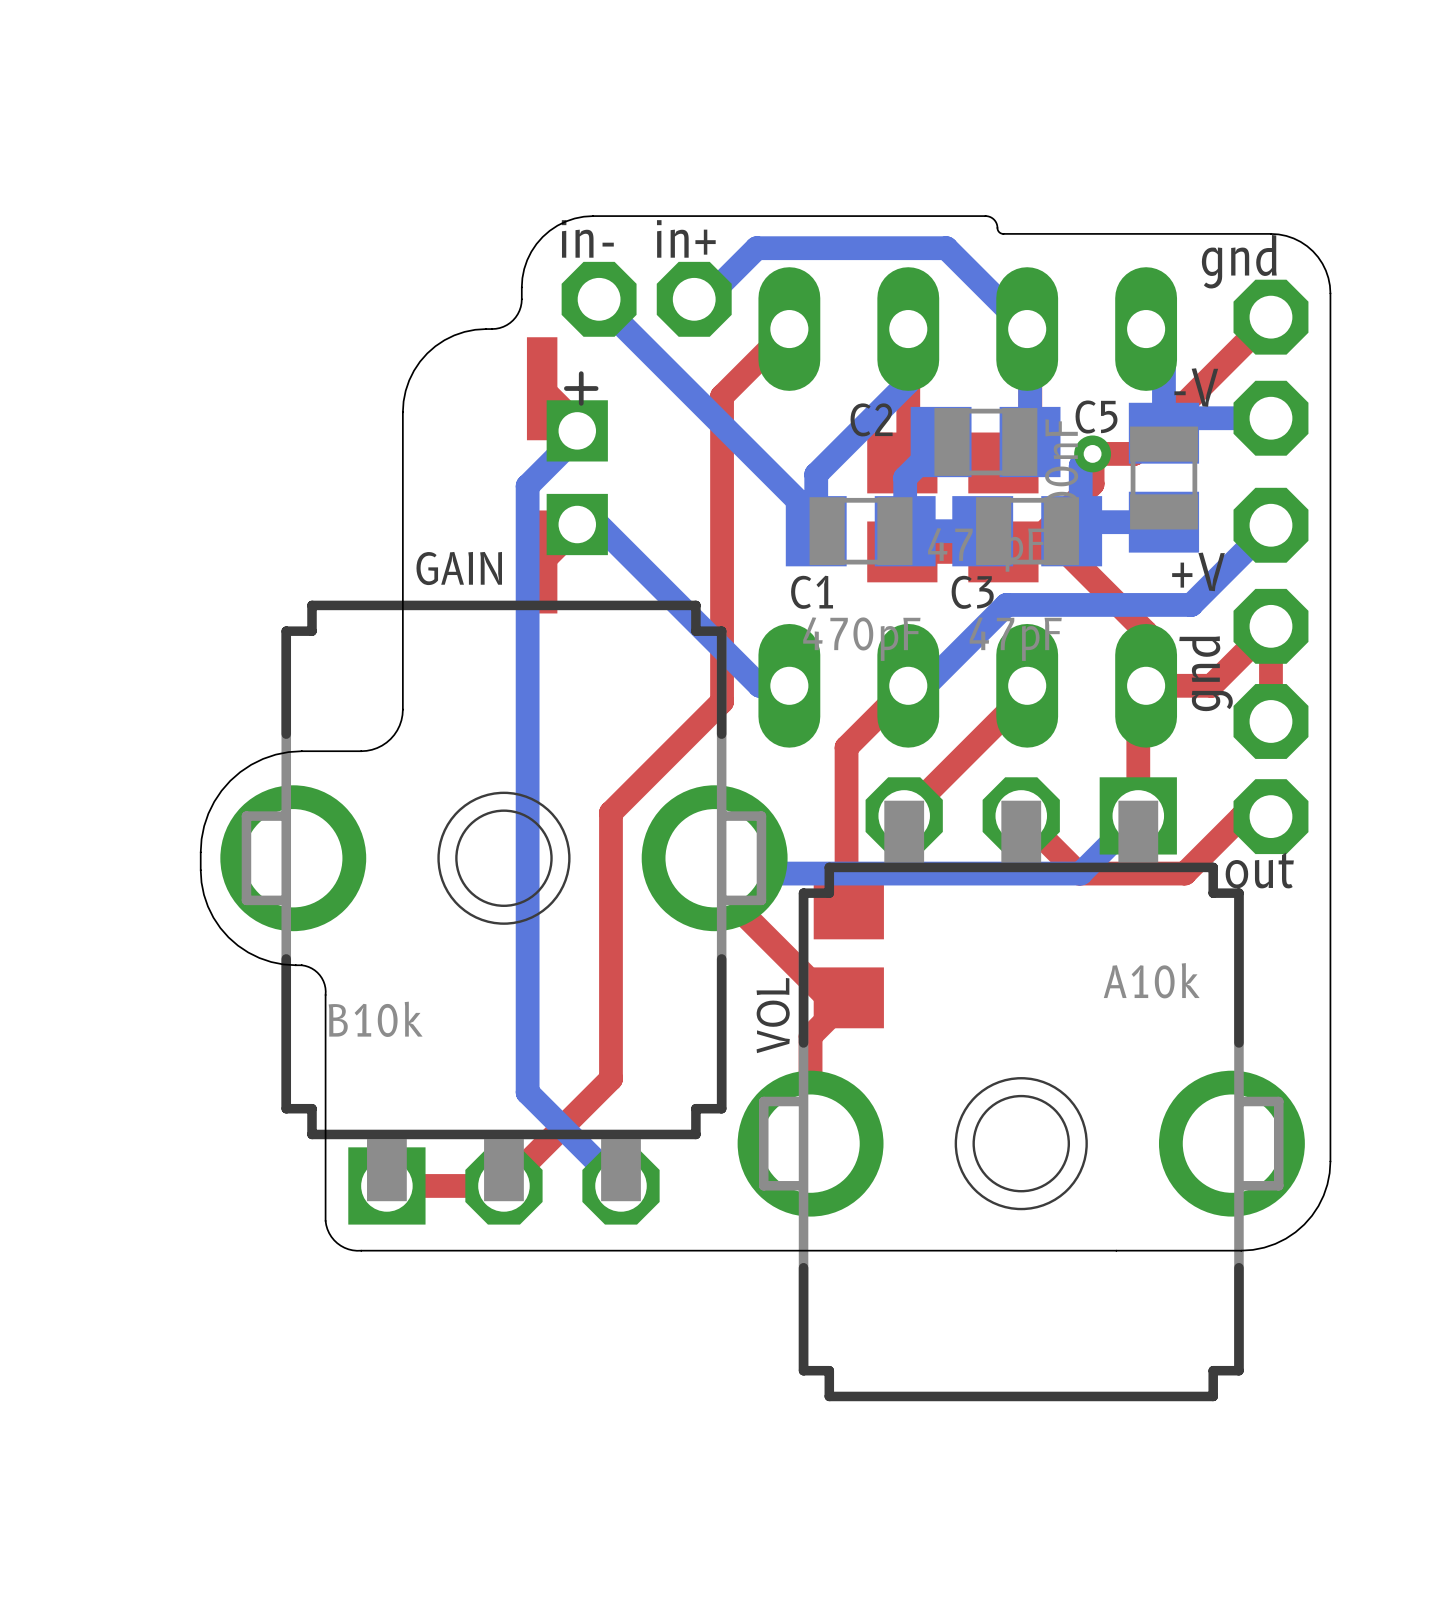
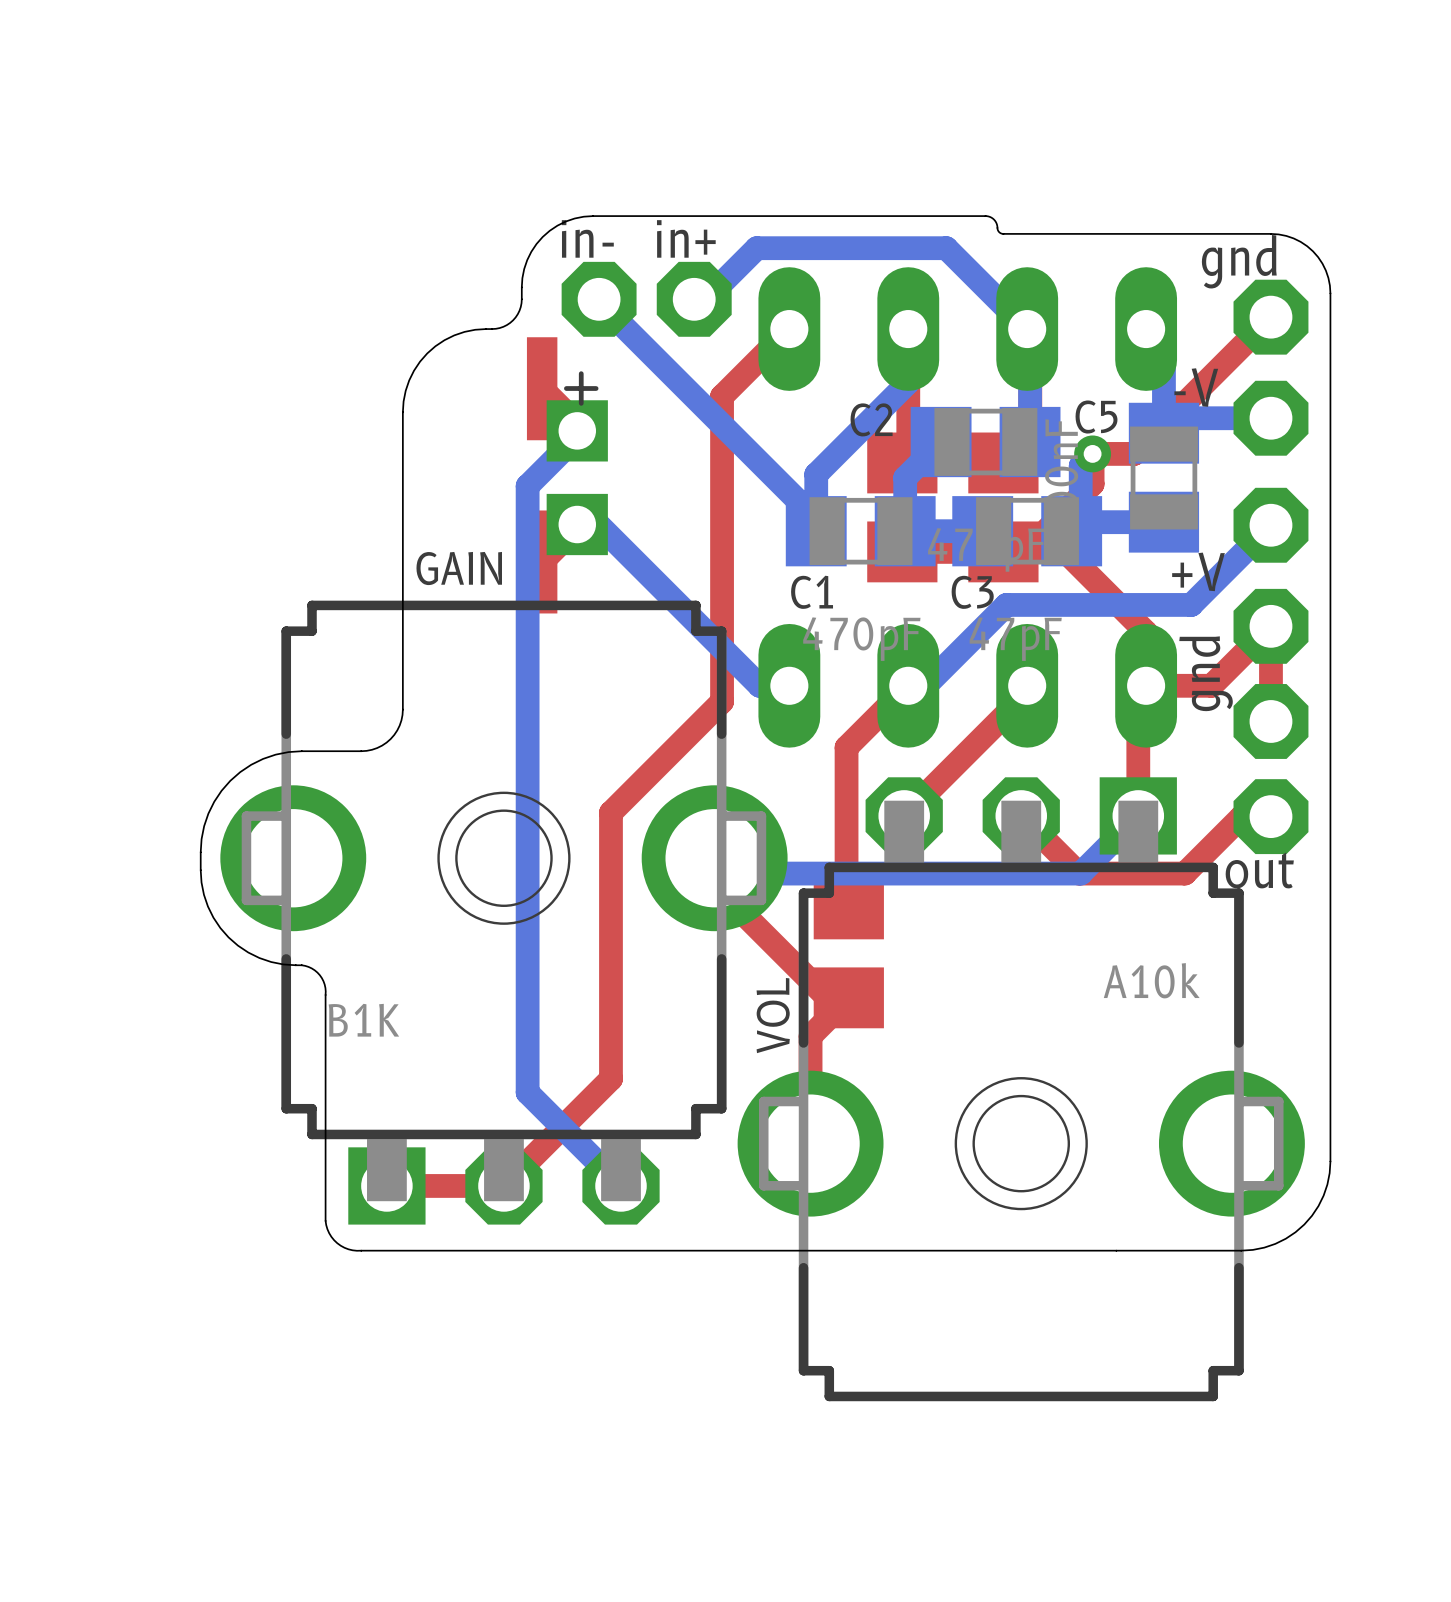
GAIN value: B10k (375, 1019) -> B1K (363, 1020)

